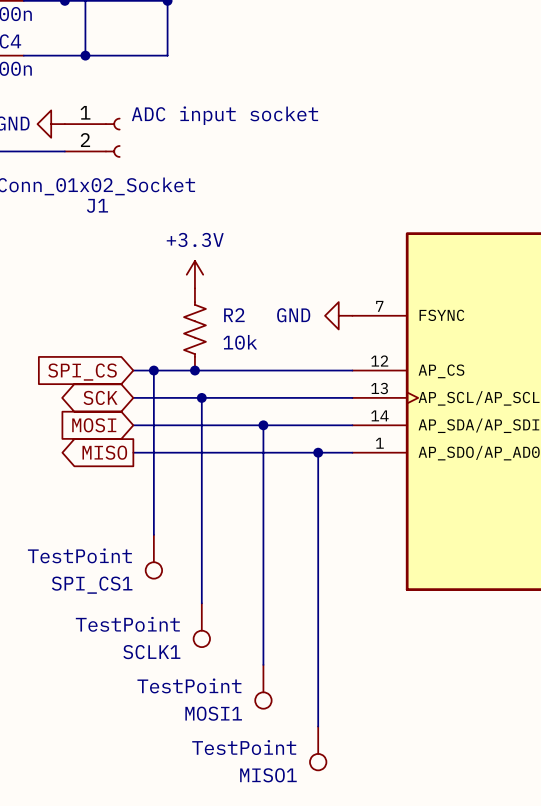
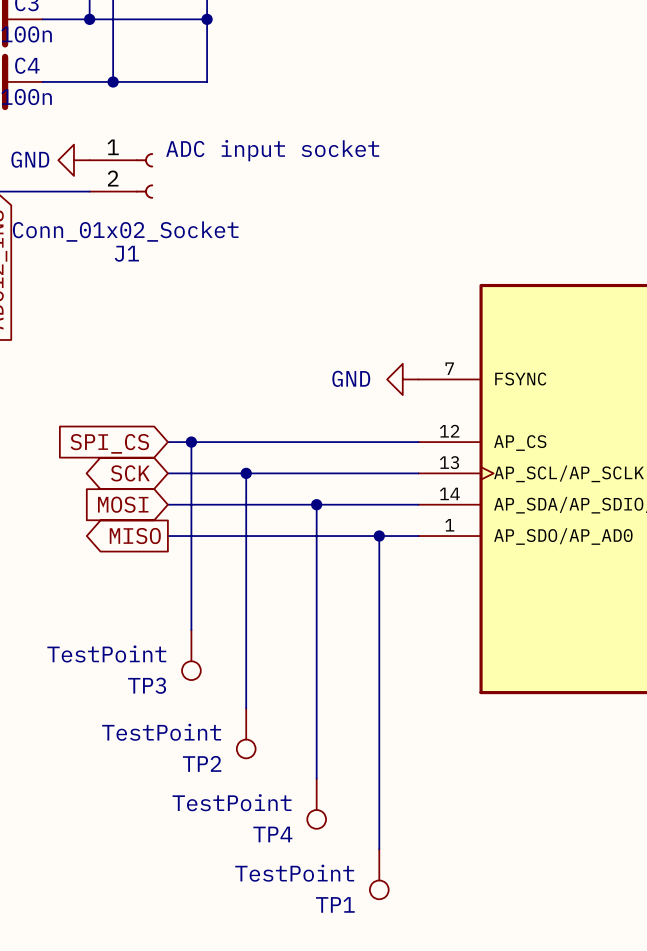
power symbol: +3.3V (194, 274) -> none
R2: 10k (194, 329) -> none
junction: (194, 370) -> none
SPI_CS1 name: SPI_CS1 (92, 585) -> TP3 (147, 685)
SCLK1 name: SCLK1 (151, 652) -> TP2 (202, 763)
MOSI1 name: MOSI1 (213, 713) -> TP4 (272, 834)
MISO1 name: MISO1 (268, 775) -> TP1 (335, 904)

